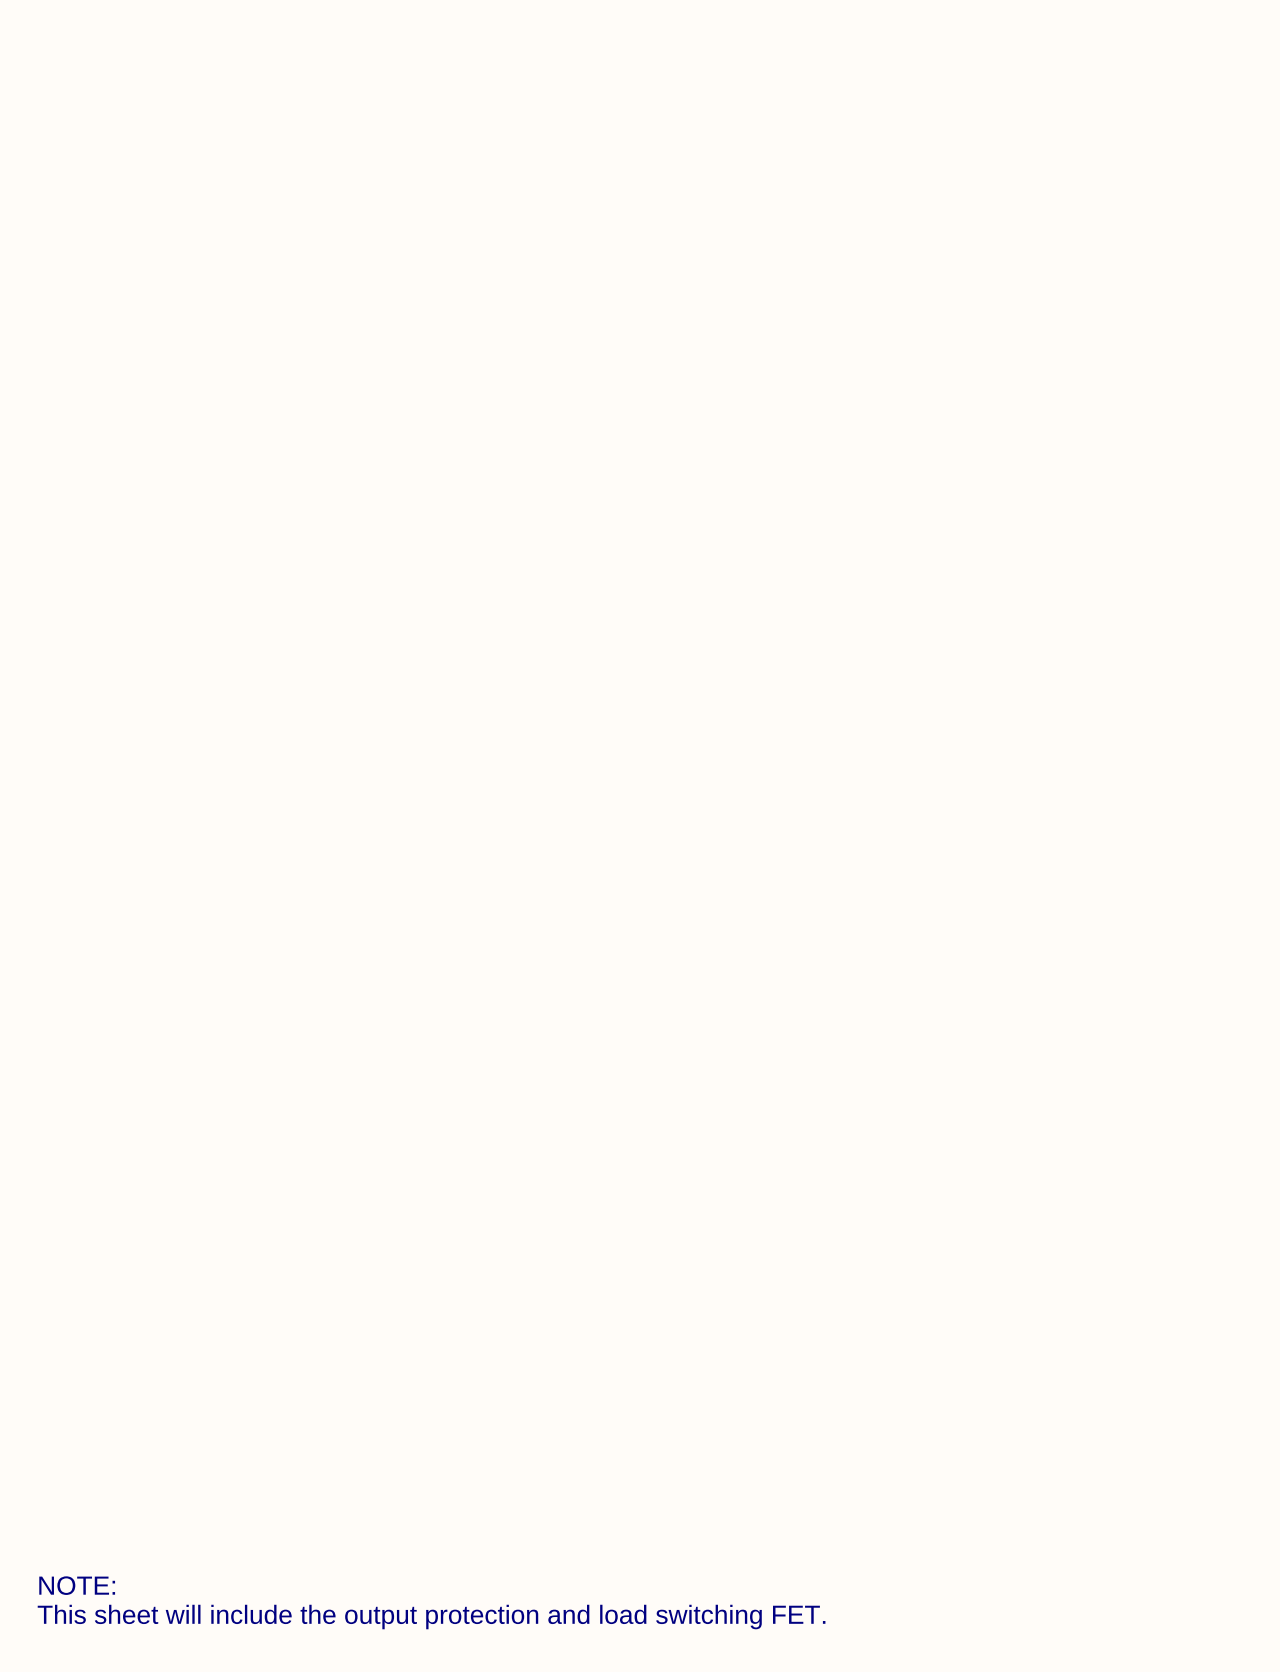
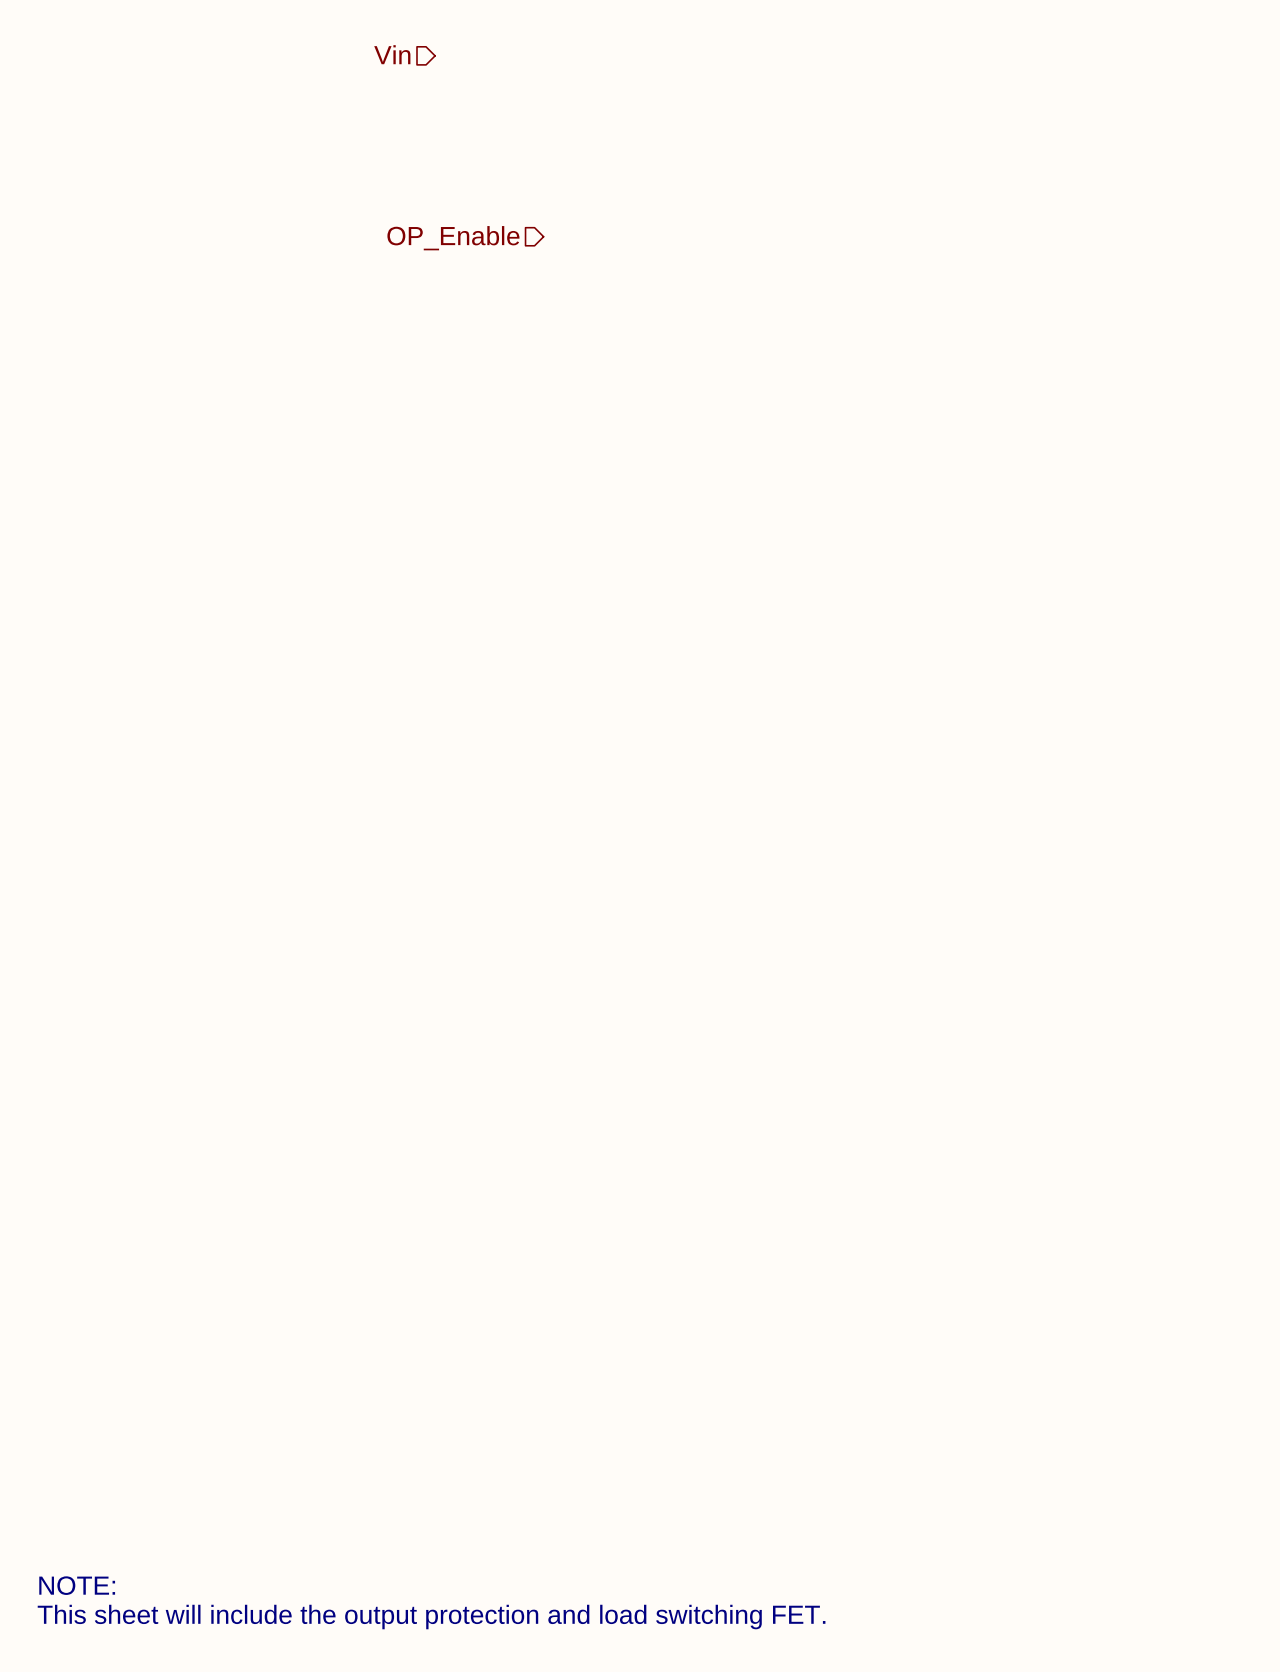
hierarchical label: none -> Vin (392, 54)
hierarchical label: none -> OP_Enable (453, 238)

